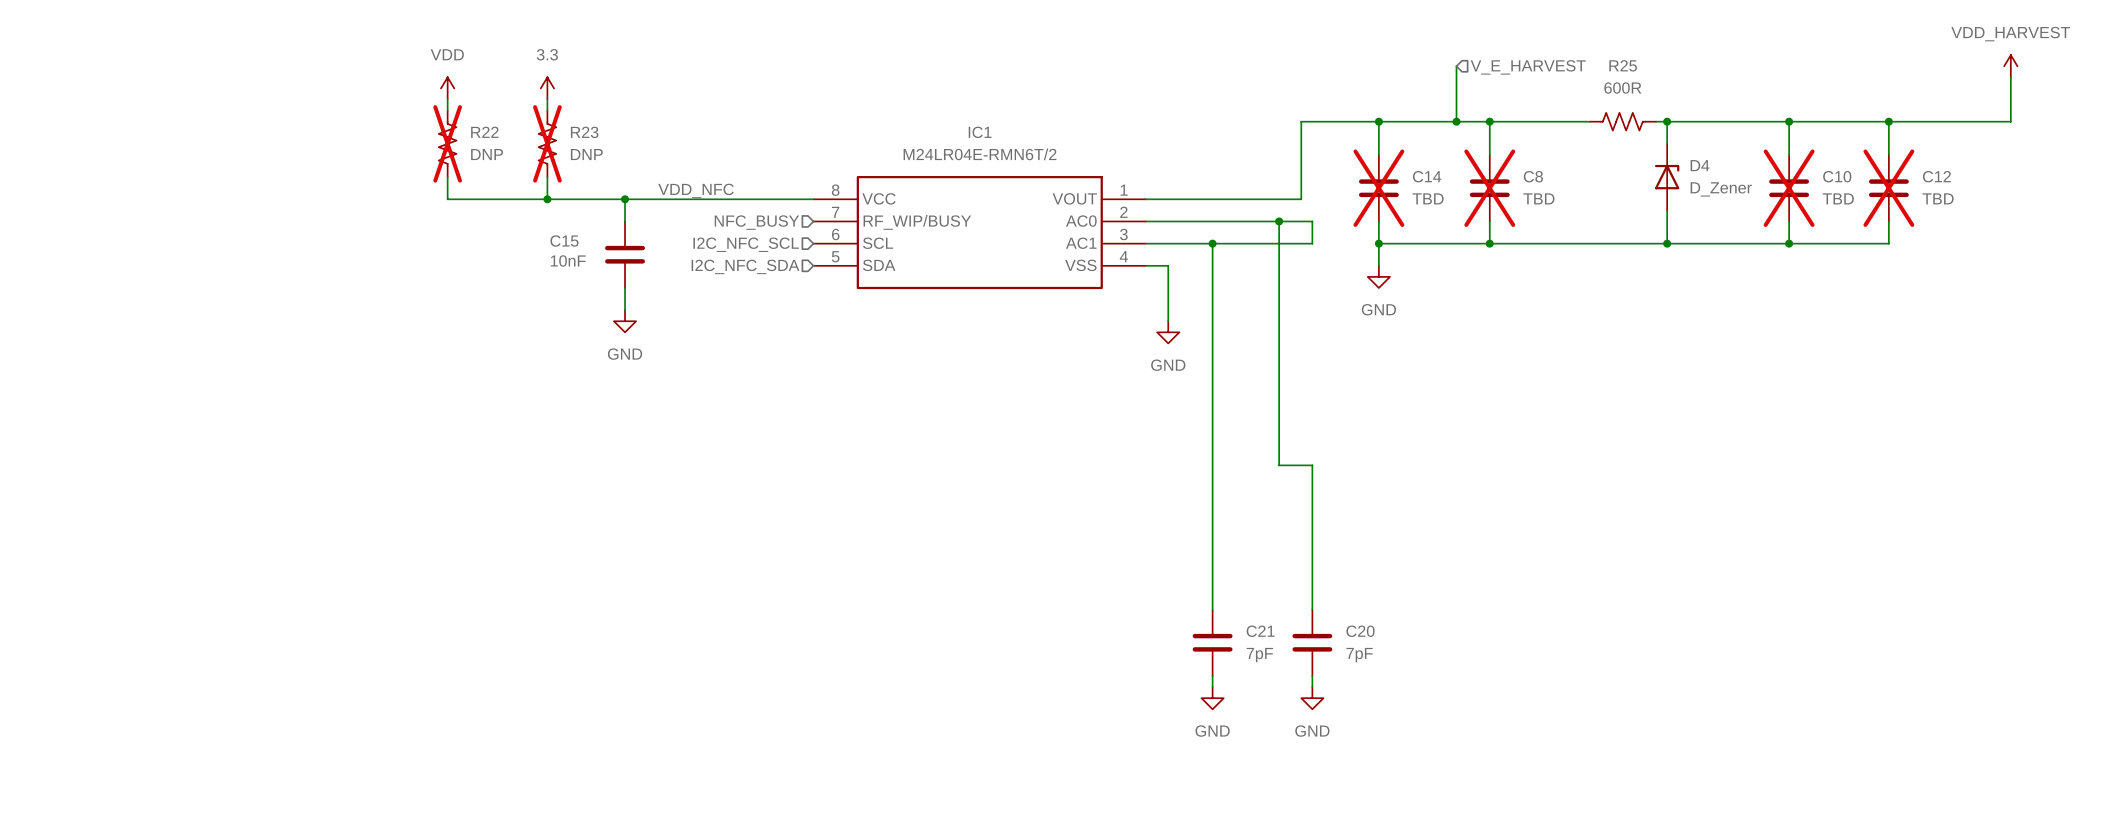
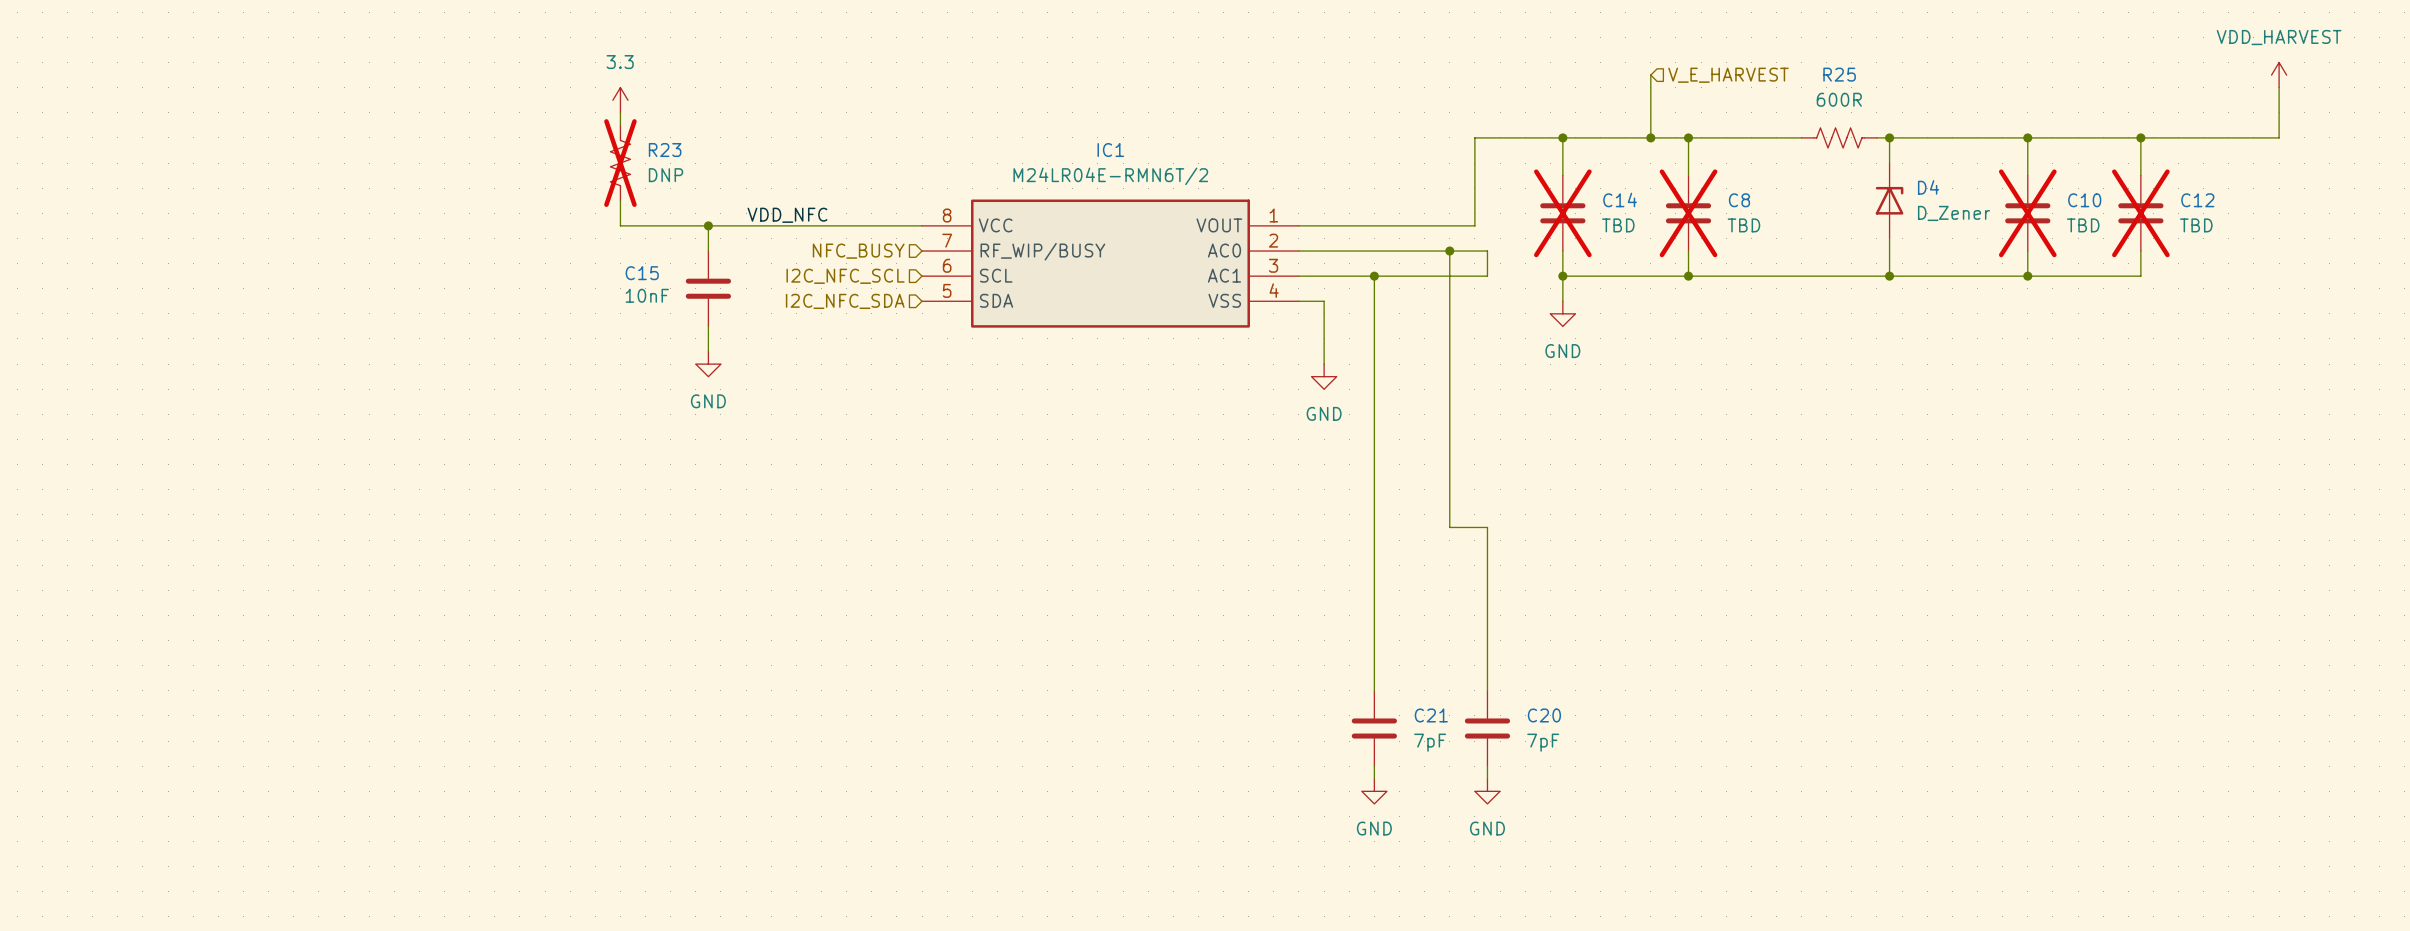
power symbol: VDD (447, 88) -> none
wire: (447, 99) (447, 110) -> none
R22: DNP (447, 143) -> none
wire: (447, 177) (447, 199) (547, 199) -> none
junction: (547, 199) -> none

